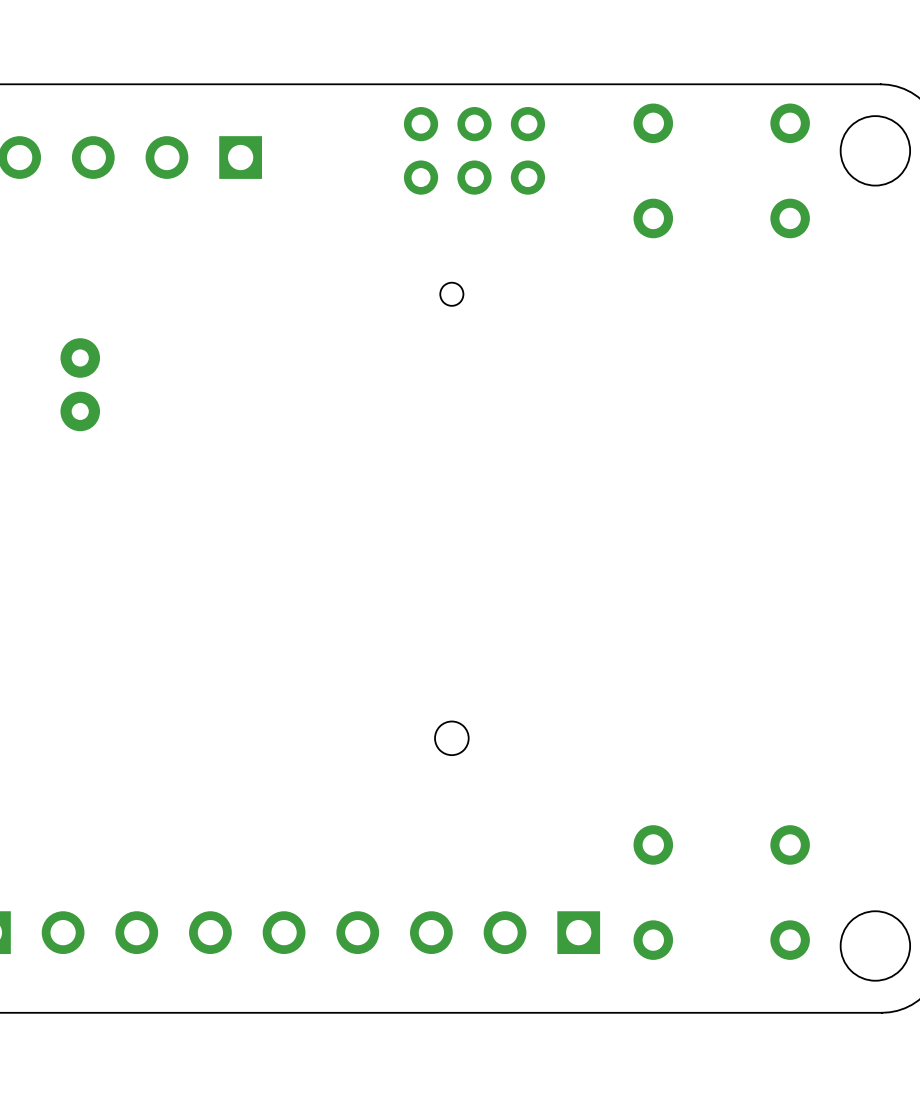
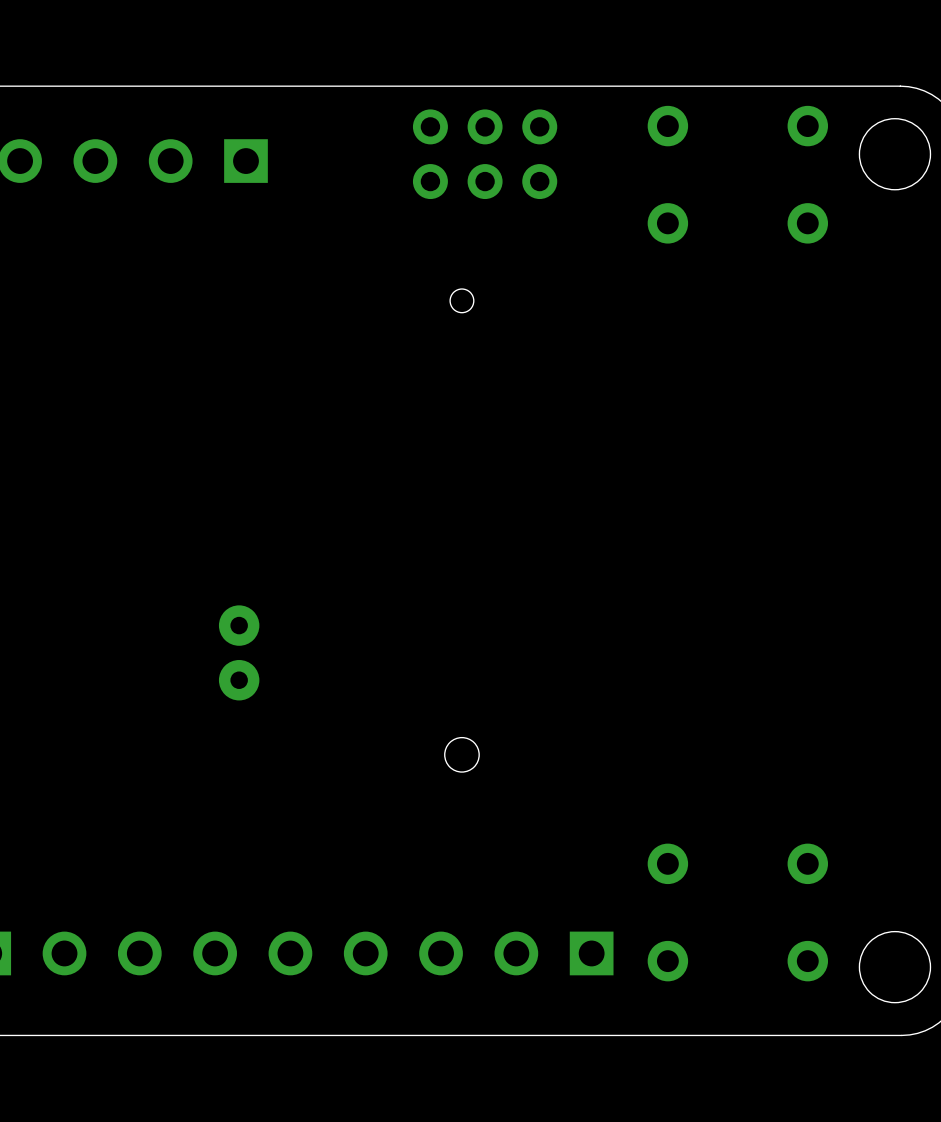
part position: (80, 384) -> (239, 652)

